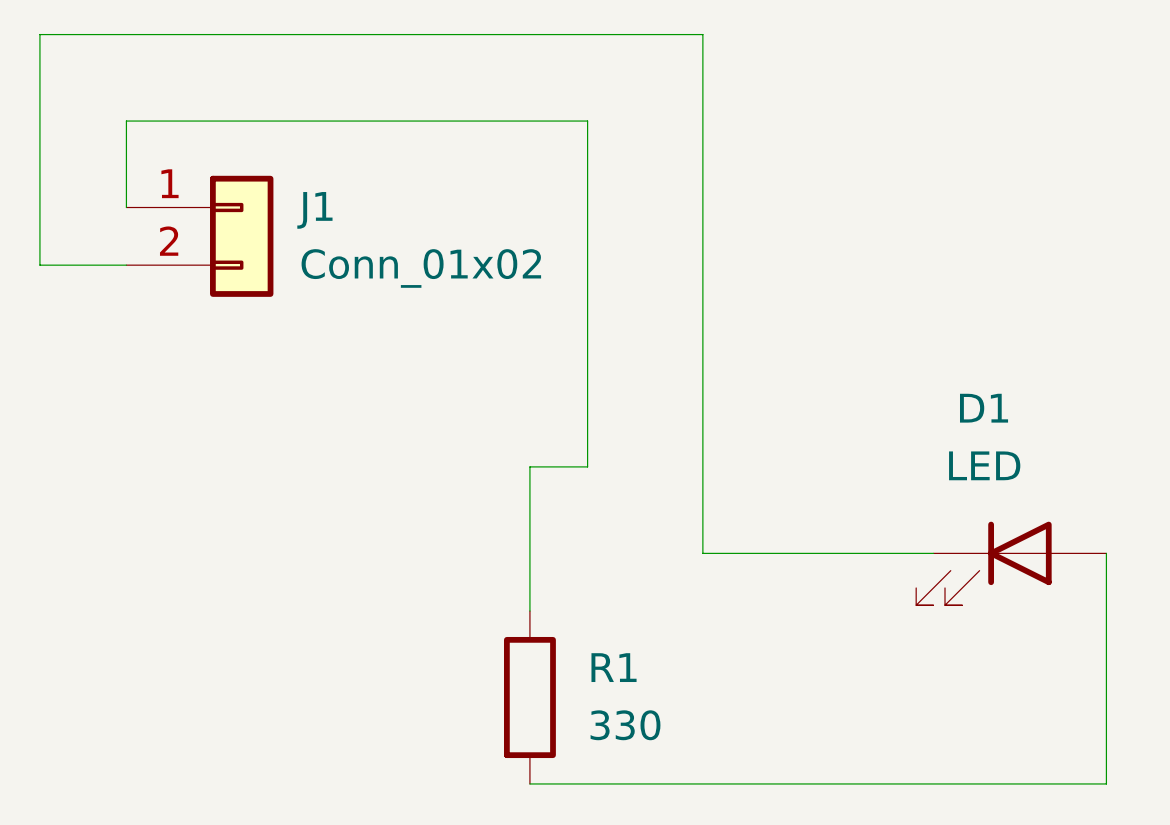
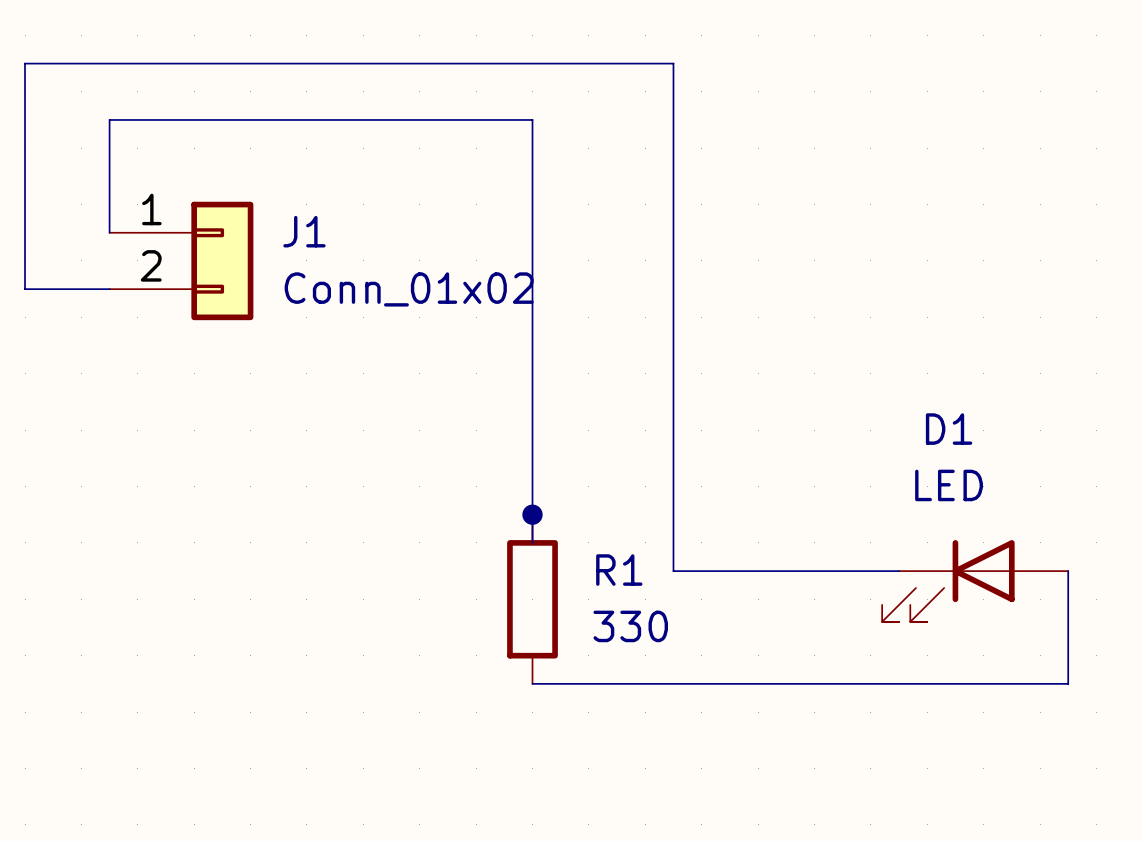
wire: (126, 121) (587, 121) (587, 466) (529, 466) (529, 611) -> (109, 148) (109, 119) (532, 119) (532, 542)
junction: none -> (532, 514)
wire: (1106, 668) (1106, 783) (529, 783) -> (1068, 683) (532, 683)
R1 position: (529, 697) -> (532, 599)

